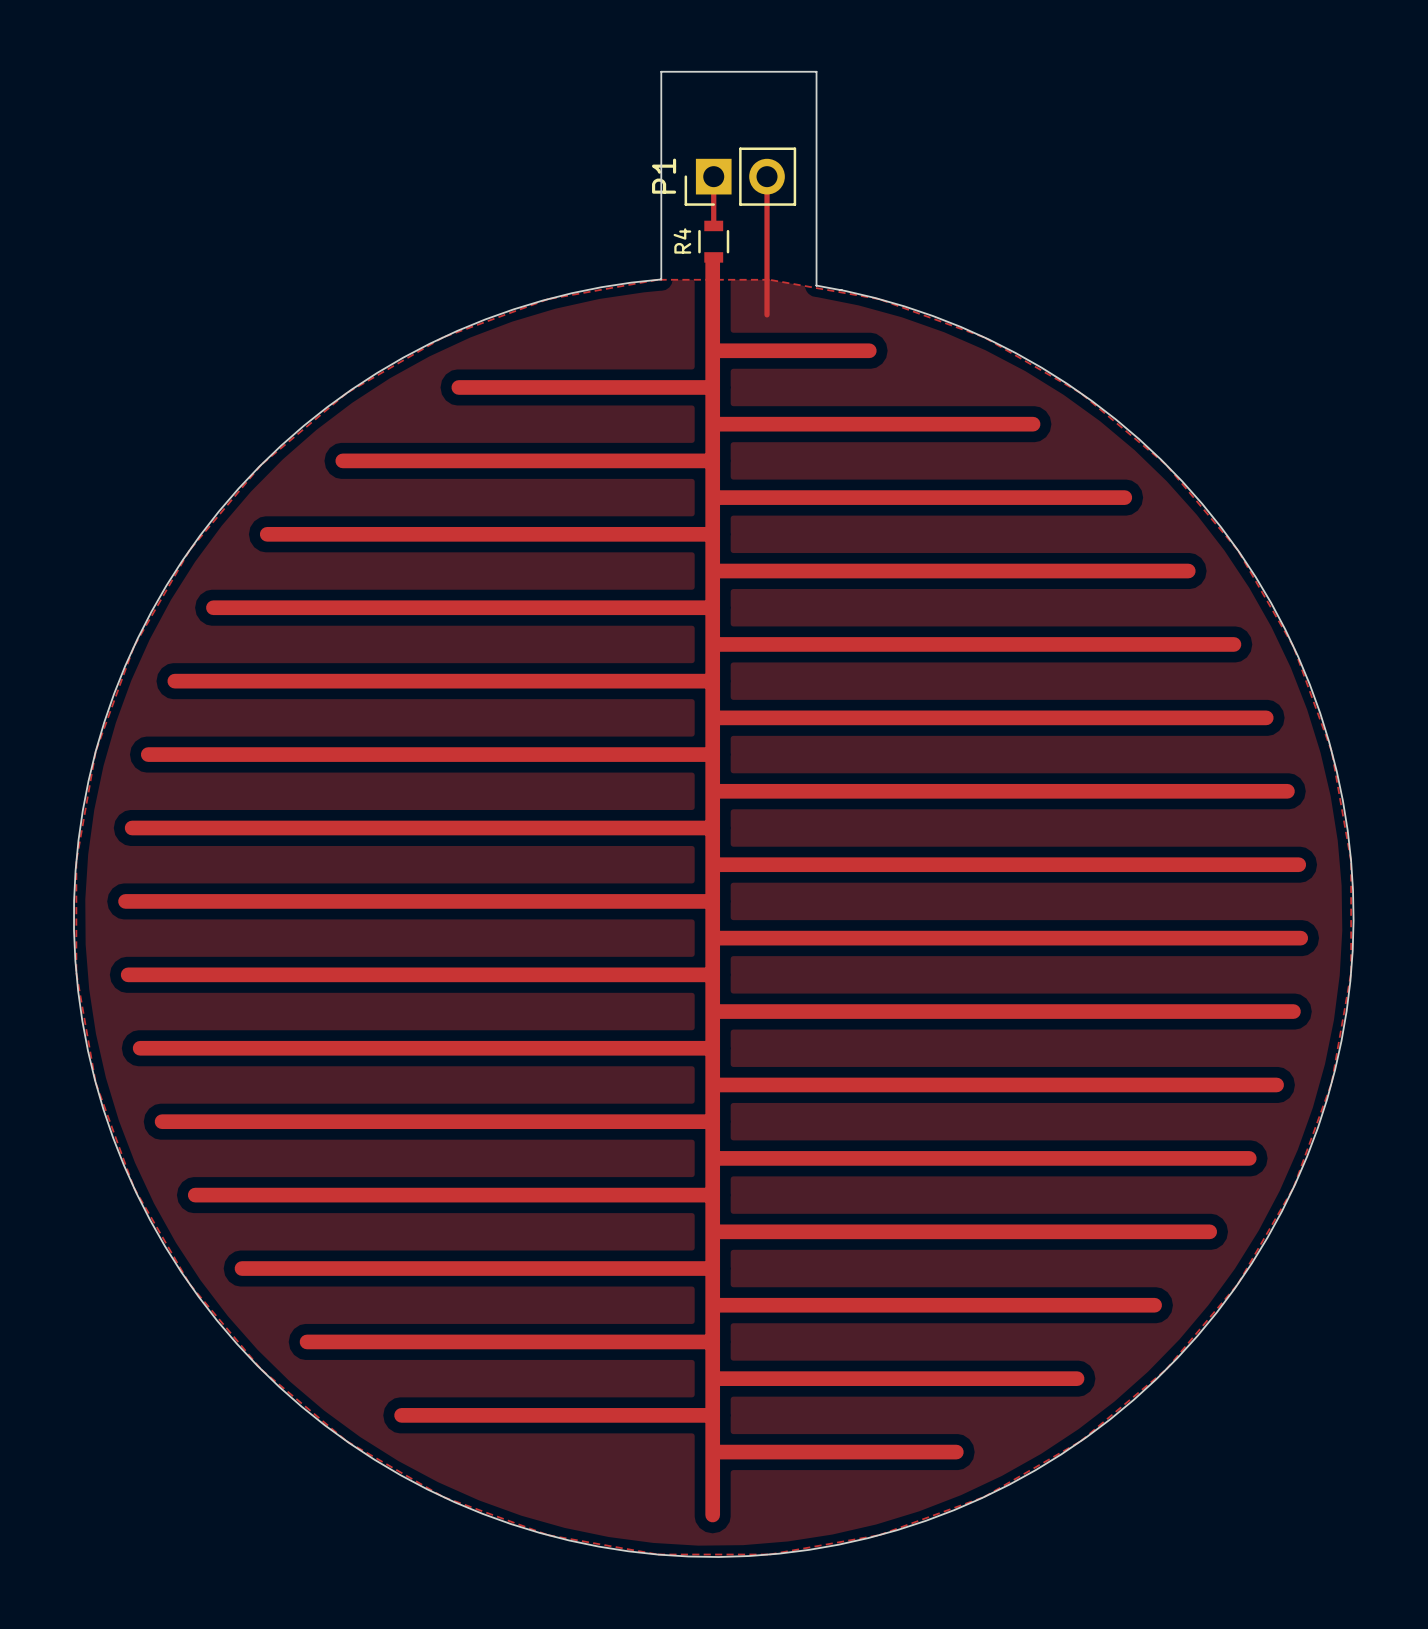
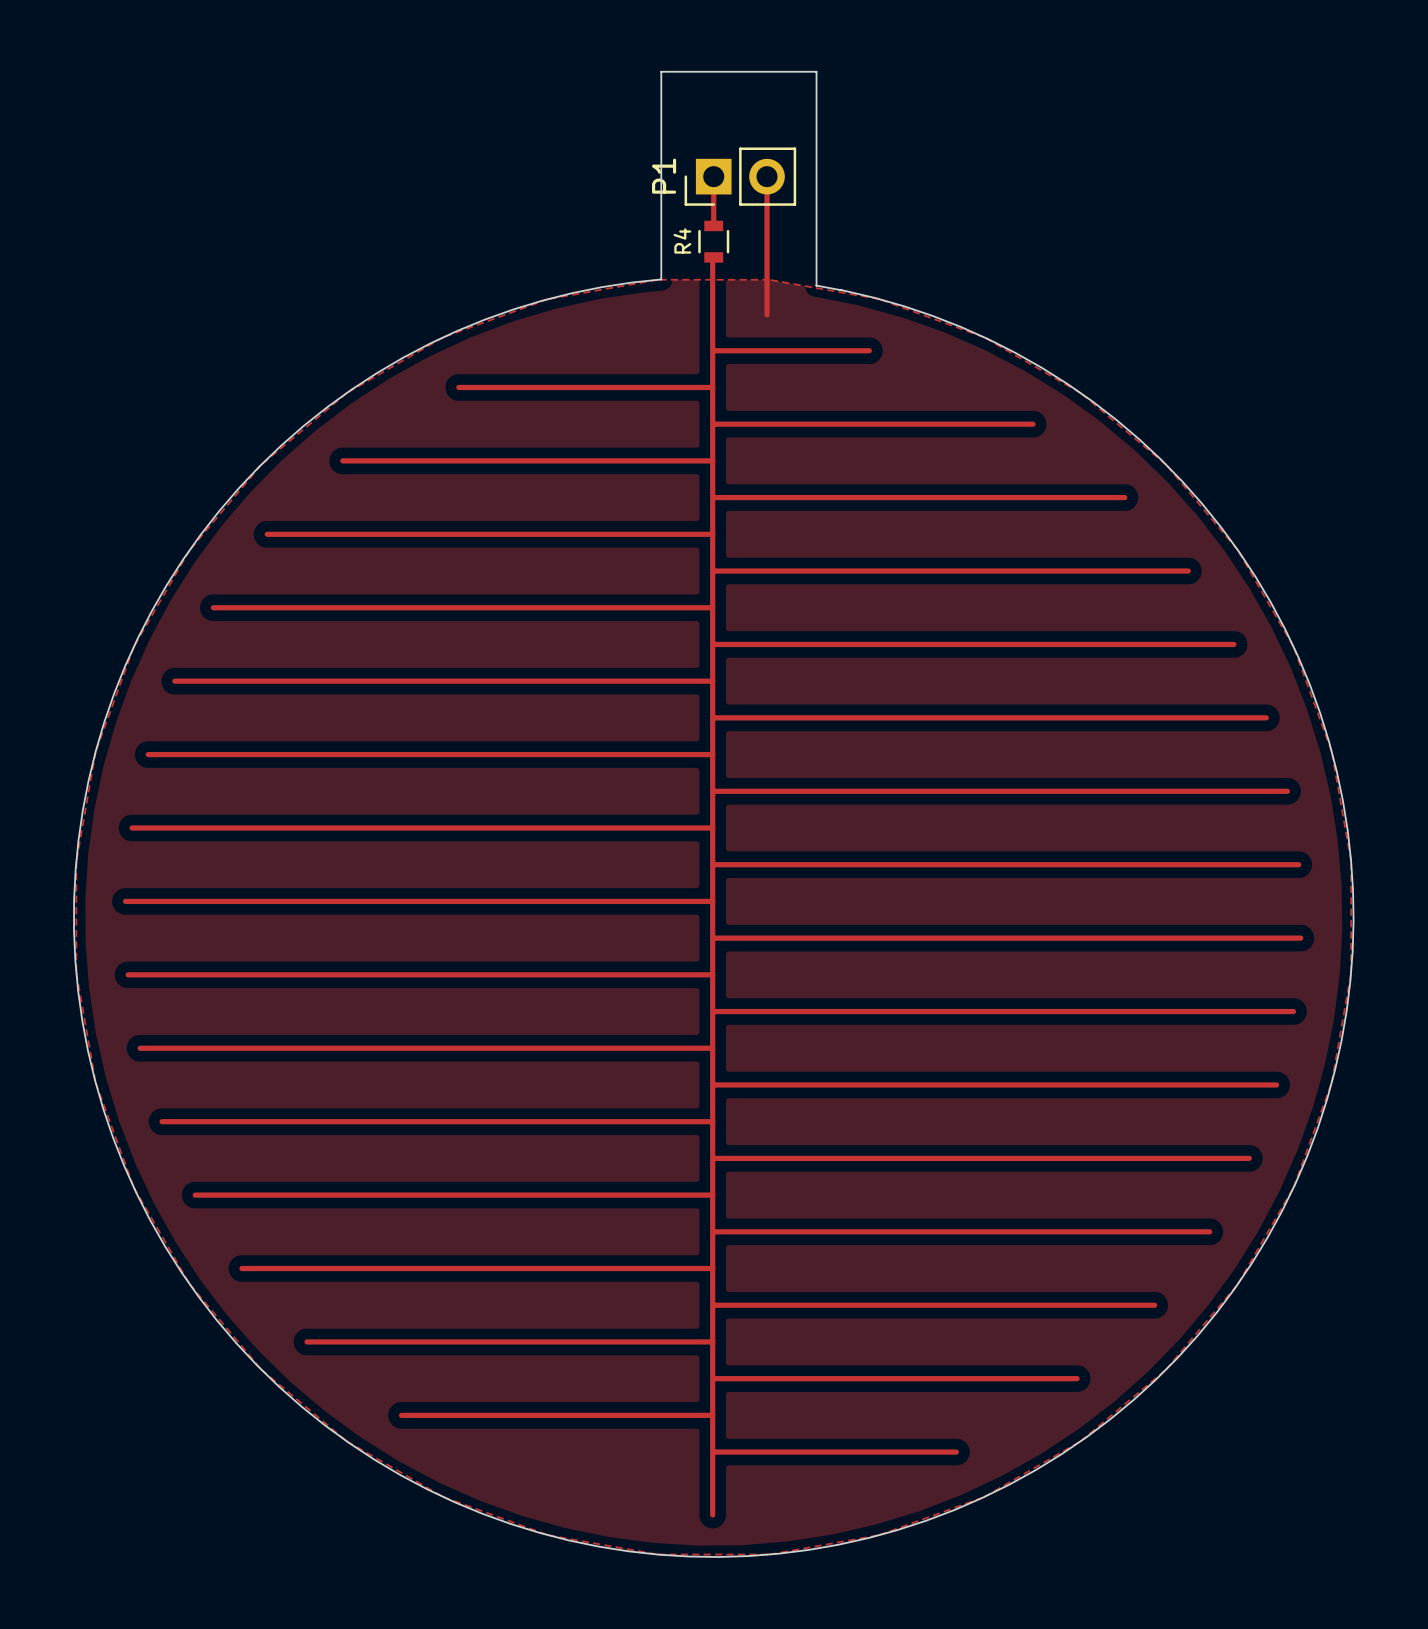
track width: thick (712, 260) (712, 1515) -> thin (712, 260) (712, 1515)
track width: thick (713, 350) (869, 350) -> thin (713, 350) (869, 350)
track width: thick (458, 387) (712, 387) -> thin (458, 387) (712, 387)
track width: thick (713, 424) (1033, 424) -> thin (713, 424) (1033, 424)
track width: thick (342, 460) (712, 460) -> thin (342, 460) (712, 460)
track width: thick (713, 497) (1124, 497) -> thin (713, 497) (1124, 497)
track width: thick (267, 534) (712, 534) -> thin (267, 534) (712, 534)
track width: thick (713, 571) (1188, 571) -> thin (713, 571) (1188, 571)
track width: thick (213, 607) (712, 607) -> thin (213, 607) (712, 607)
track width: thick (713, 644) (1233, 644) -> thin (713, 644) (1233, 644)
track width: thick (174, 681) (712, 681) -> thin (174, 681) (712, 681)
track width: thick (713, 717) (1266, 717) -> thin (713, 717) (1266, 717)
track width: thick (148, 754) (712, 754) -> thin (148, 754) (712, 754)
track width: thick (713, 791) (1287, 791) -> thin (713, 791) (1287, 791)
track width: thick (132, 828) (712, 828) -> thin (132, 828) (712, 828)
track width: thick (713, 864) (1298, 864) -> thin (713, 864) (1298, 864)
track width: thick (125, 901) (712, 901) -> thin (125, 901) (712, 901)
track width: thick (713, 938) (1300, 938) -> thin (713, 938) (1300, 938)
track width: thick (128, 974) (712, 974) -> thin (128, 974) (712, 974)
track width: thick (713, 1011) (1293, 1011) -> thin (713, 1011) (1293, 1011)
track width: thick (140, 1048) (712, 1048) -> thin (140, 1048) (712, 1048)
track width: thick (713, 1084) (1276, 1084) -> thin (713, 1084) (1276, 1084)
track width: thick (162, 1121) (712, 1121) -> thin (162, 1121) (712, 1121)
track width: thick (713, 1158) (1249, 1158) -> thin (713, 1158) (1249, 1158)
track width: thick (195, 1195) (712, 1195) -> thin (195, 1195) (712, 1195)
track width: thick (713, 1231) (1209, 1231) -> thin (713, 1231) (1209, 1231)
track width: thick (242, 1268) (712, 1268) -> thin (242, 1268) (712, 1268)
track width: thick (713, 1305) (1154, 1305) -> thin (713, 1305) (1154, 1305)
track width: thick (307, 1341) (712, 1341) -> thin (307, 1341) (712, 1341)
track width: thick (713, 1378) (1077, 1378) -> thin (713, 1378) (1077, 1378)
track width: thick (401, 1415) (712, 1415) -> thin (401, 1415) (712, 1415)
track width: thick (713, 1452) (956, 1452) -> thin (713, 1452) (956, 1452)

